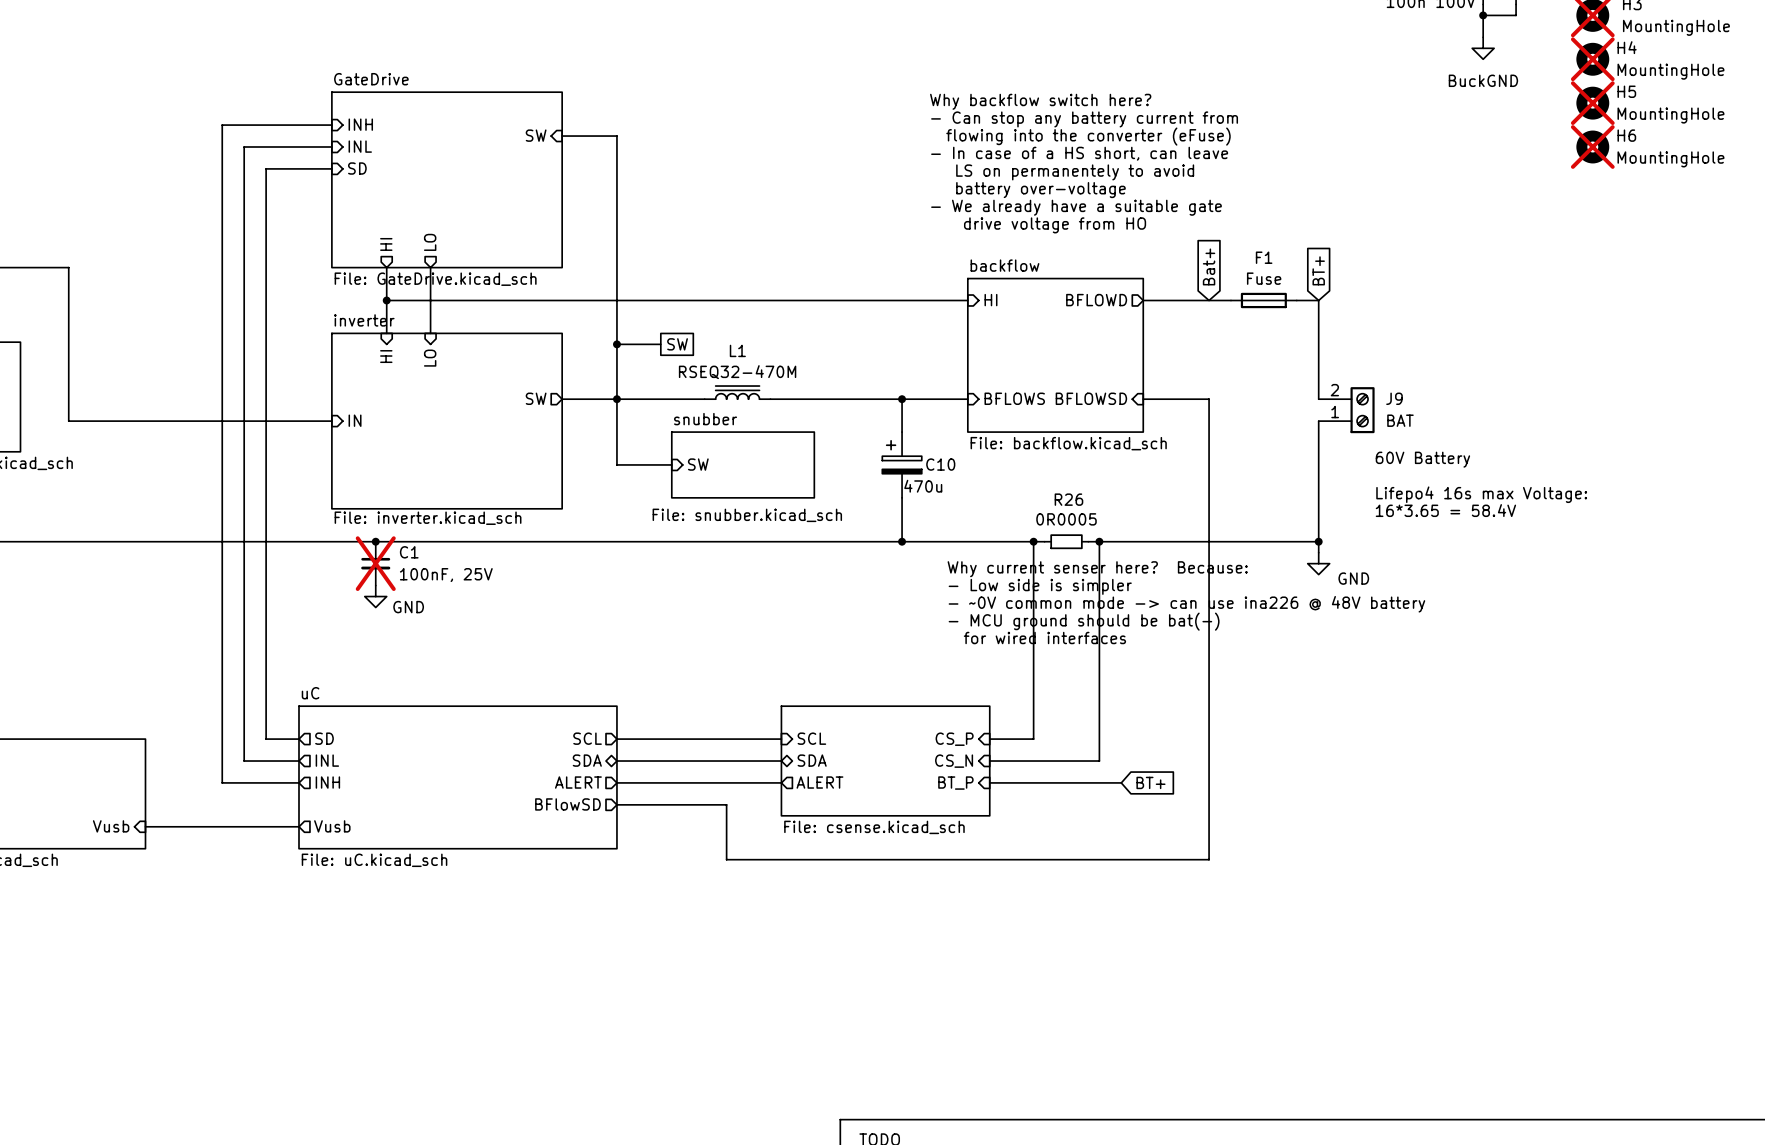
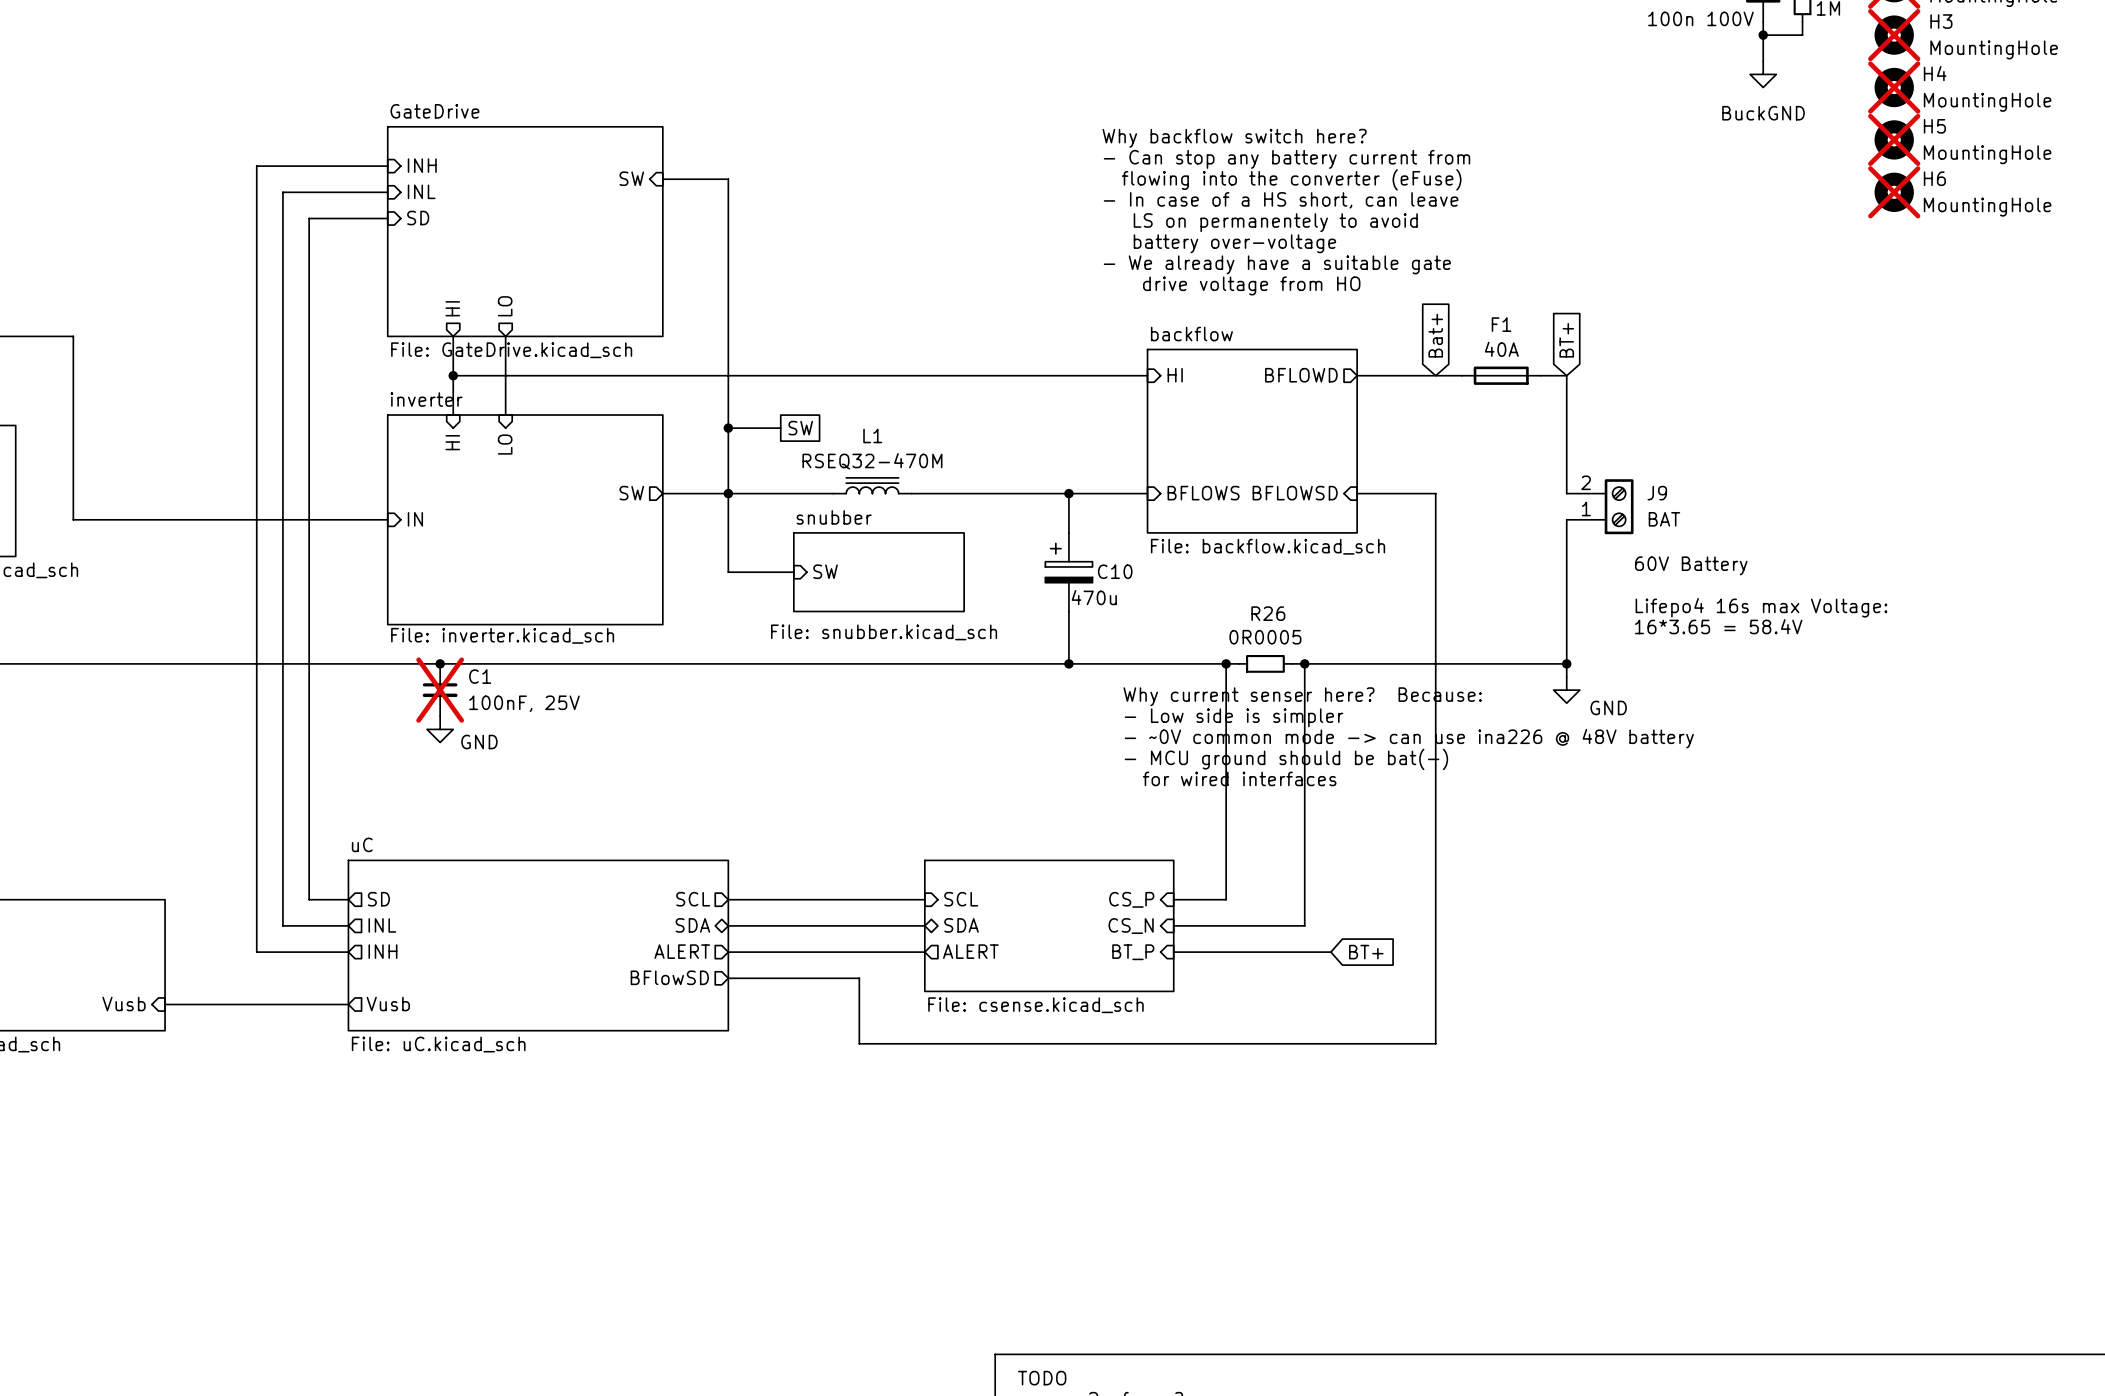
F1 value: Fuse (1264, 278) -> 40A (1501, 349)

